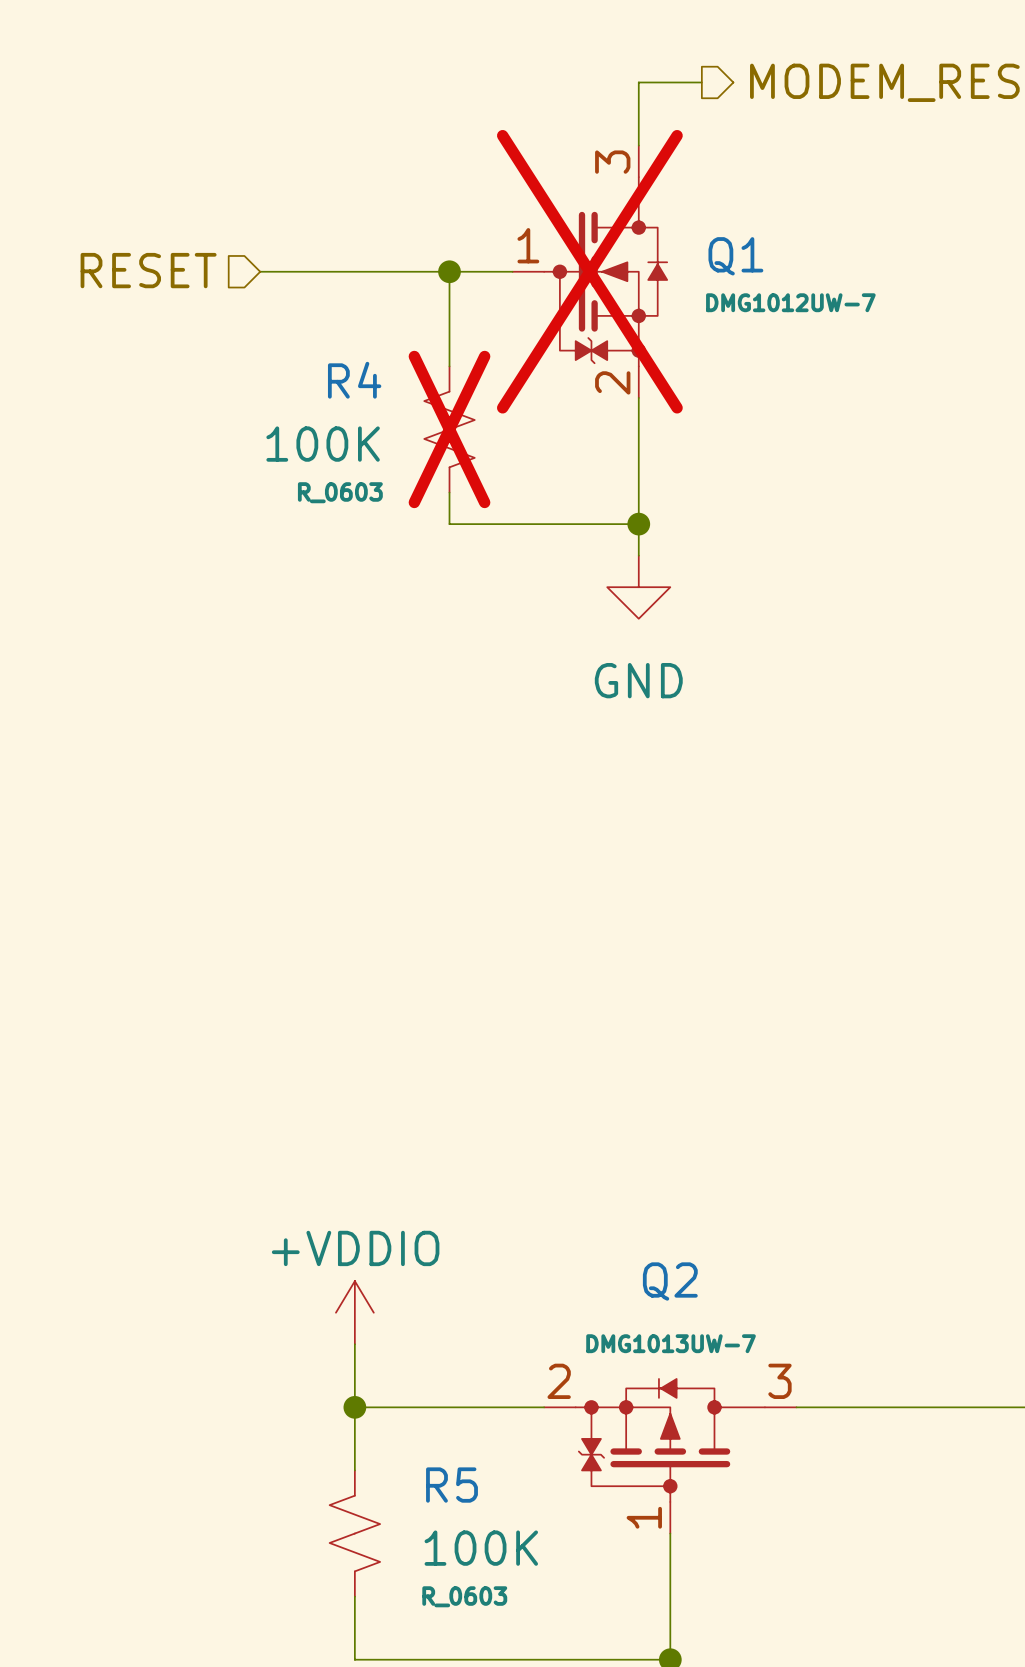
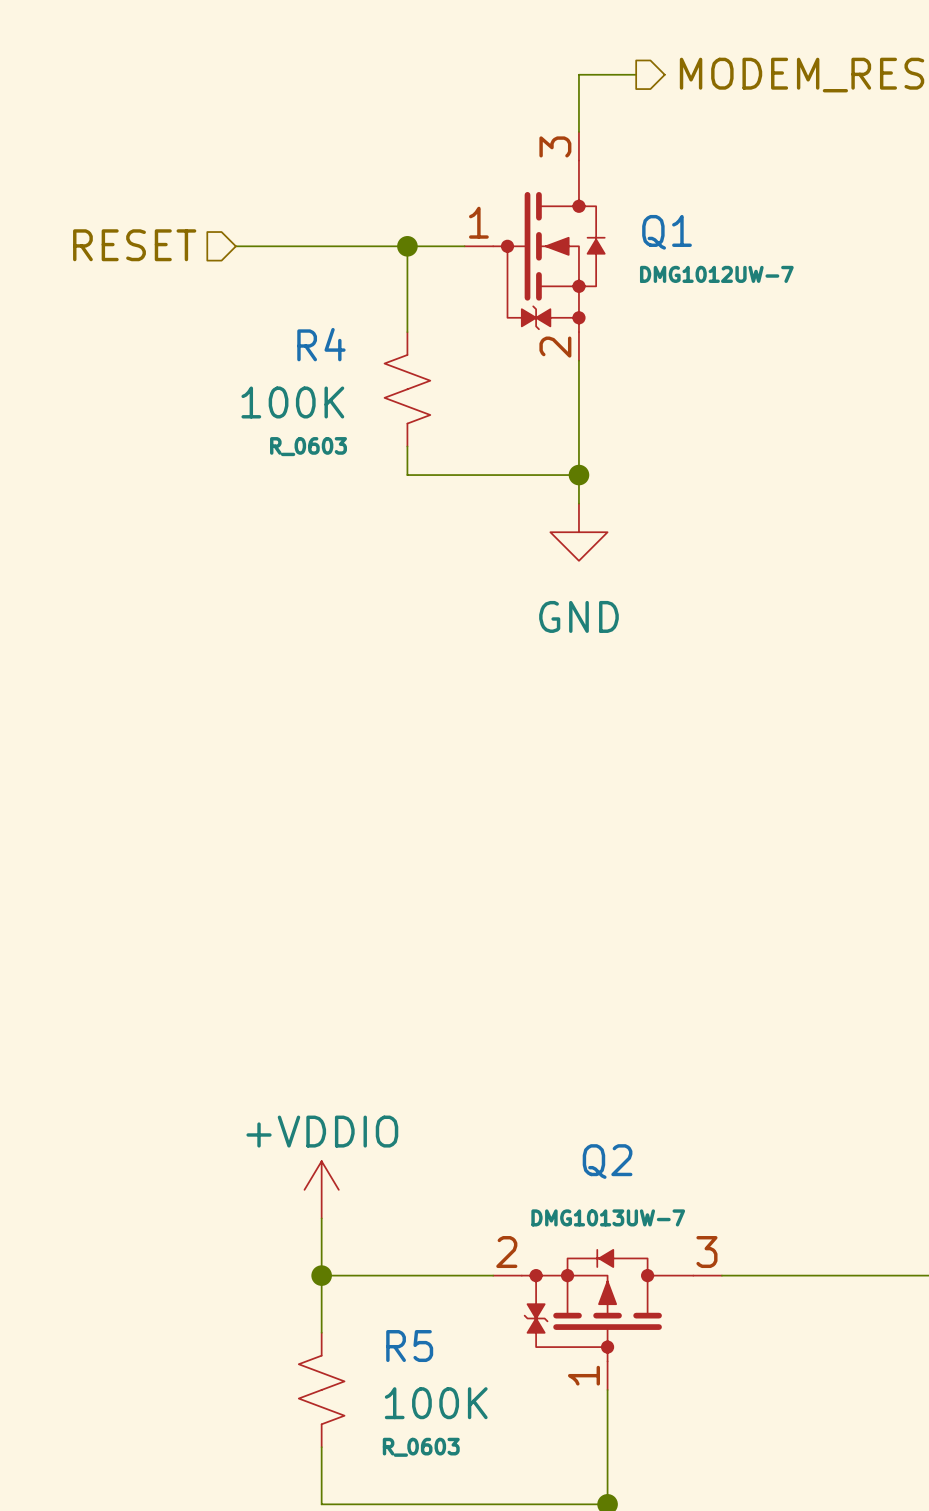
Q1 do-not-place cross: (589, 271) -> none
R4 do-not-place cross: (449, 429) -> none

